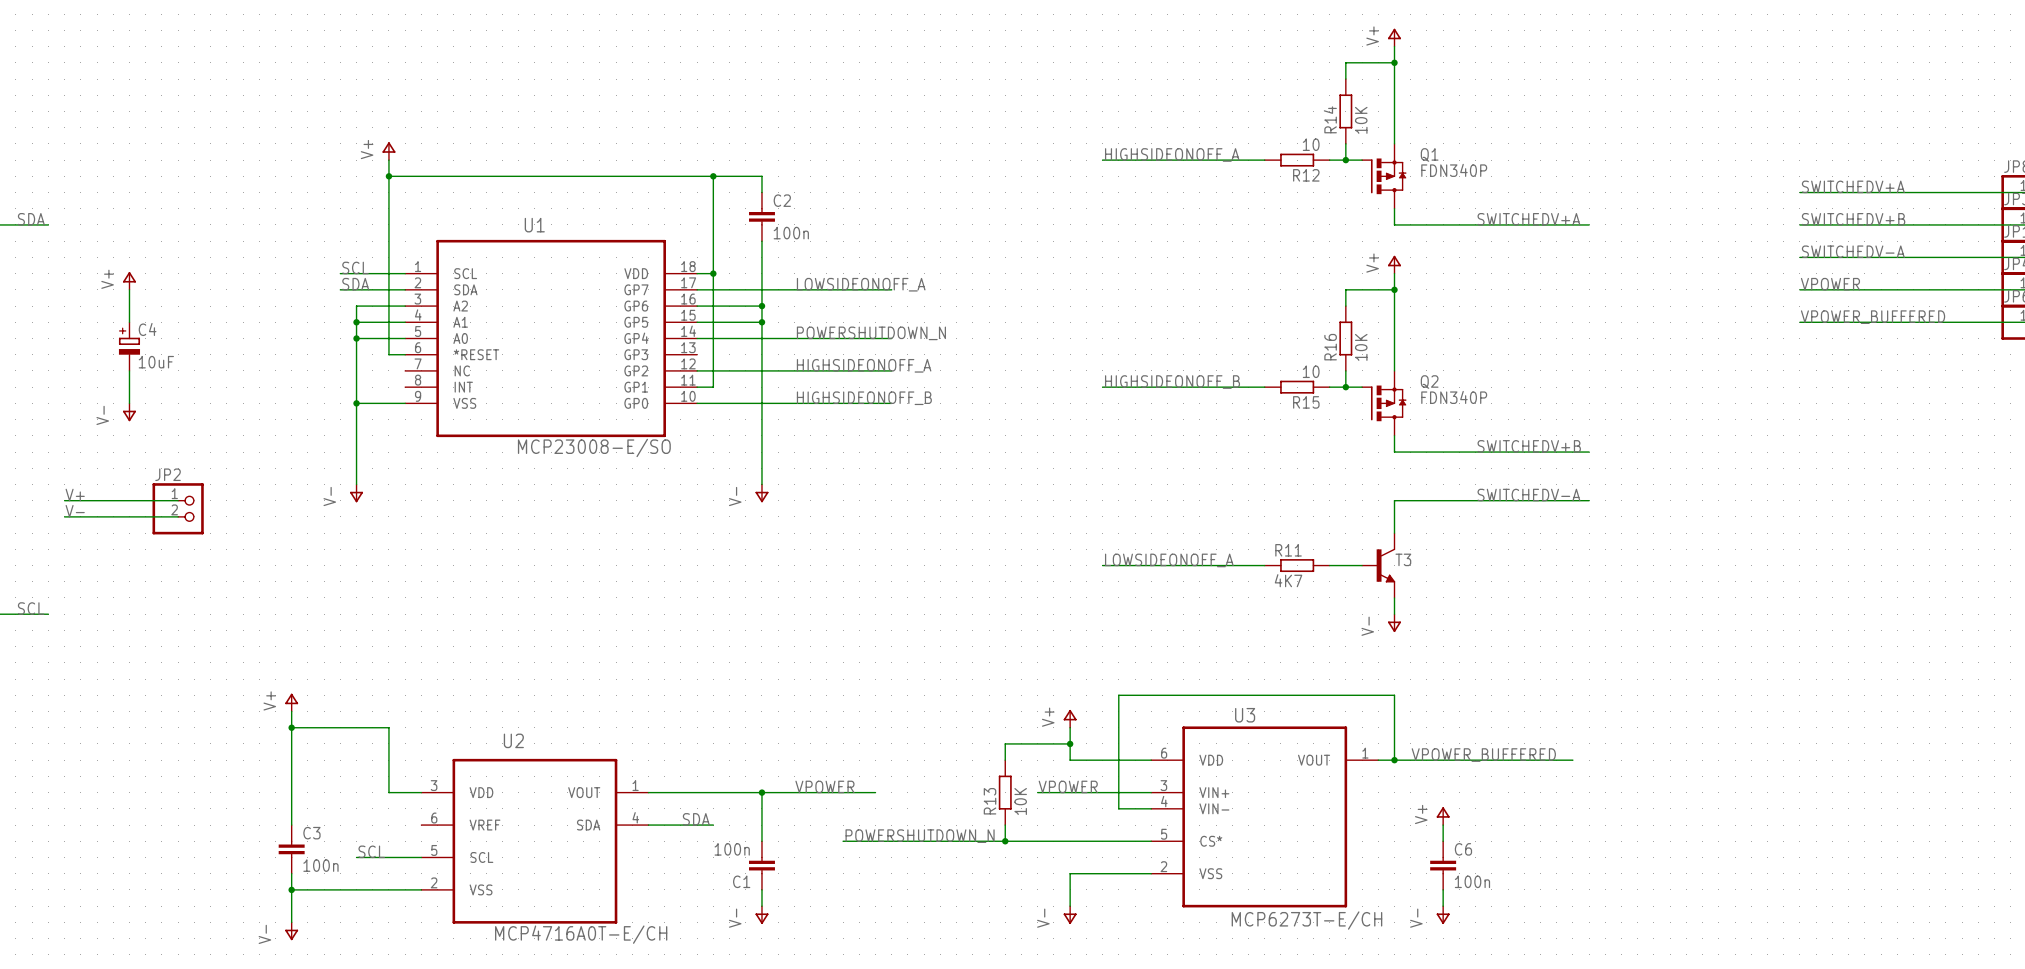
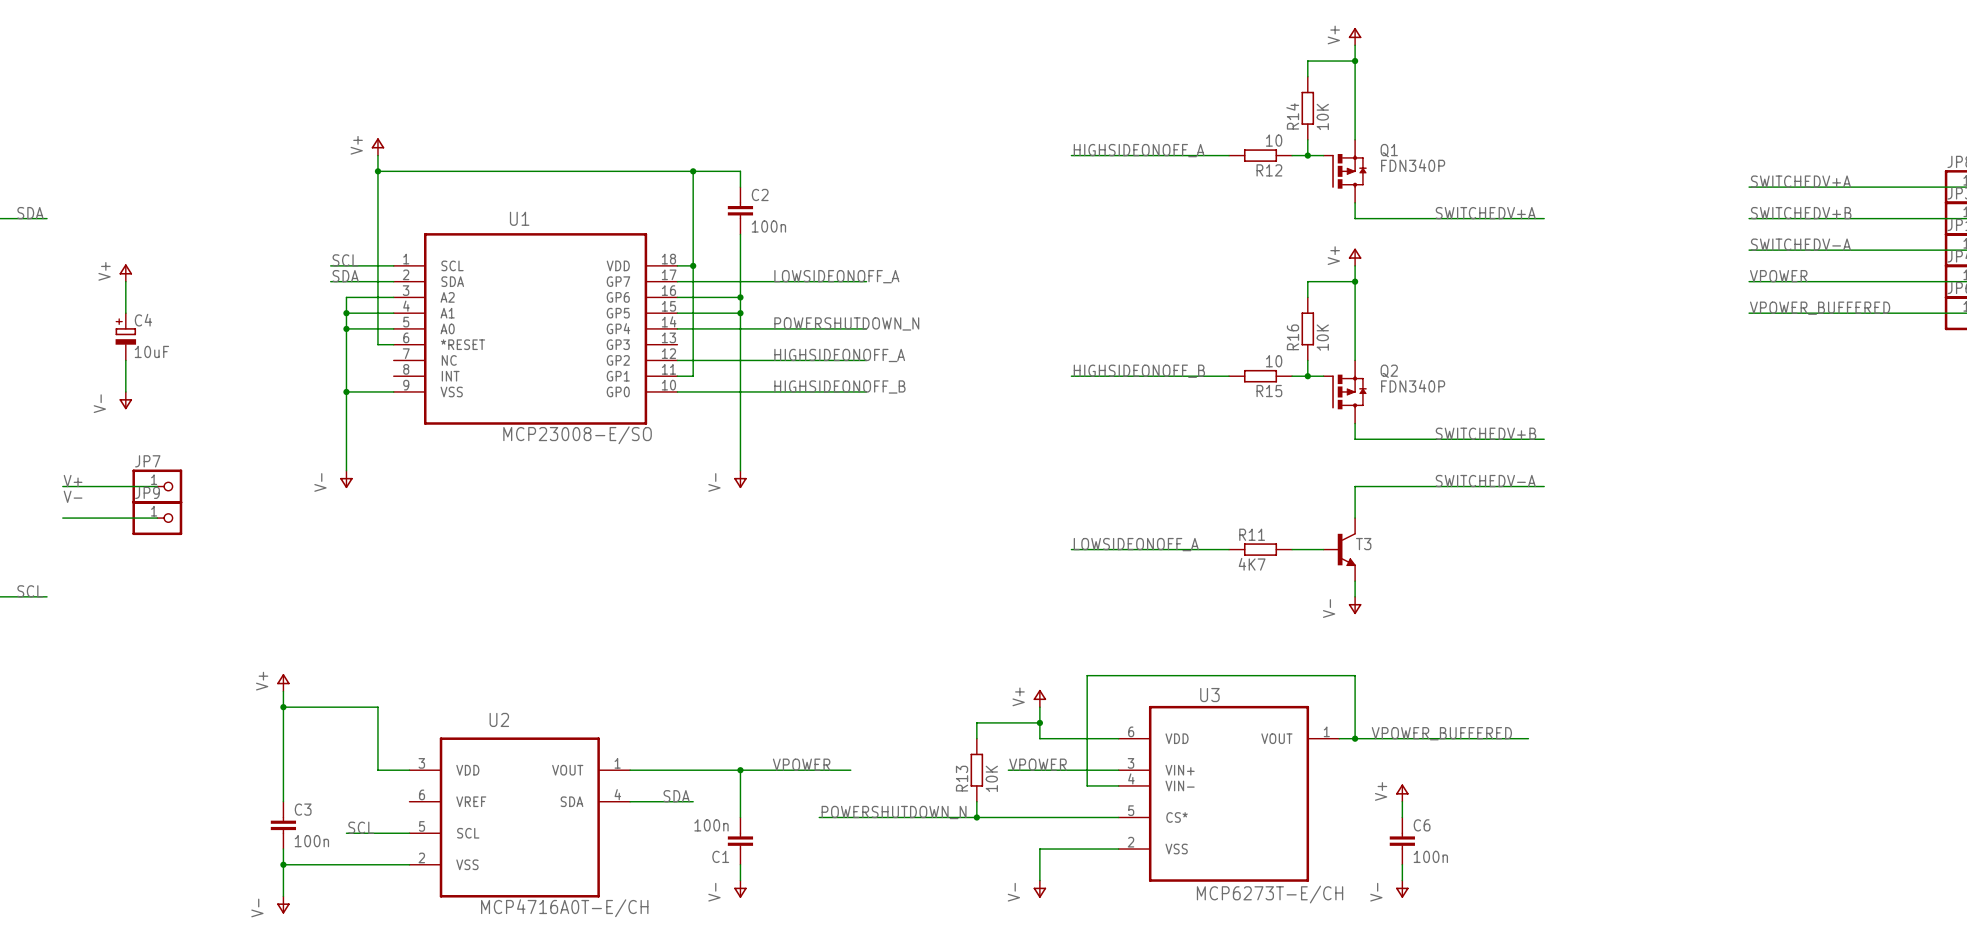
JP7: none -> (157, 486)
JP2: (178, 508) -> none
wire: (64, 516) (178, 516) -> none
wire: none -> (62, 518) (157, 518)
JP9: none -> (157, 518)

